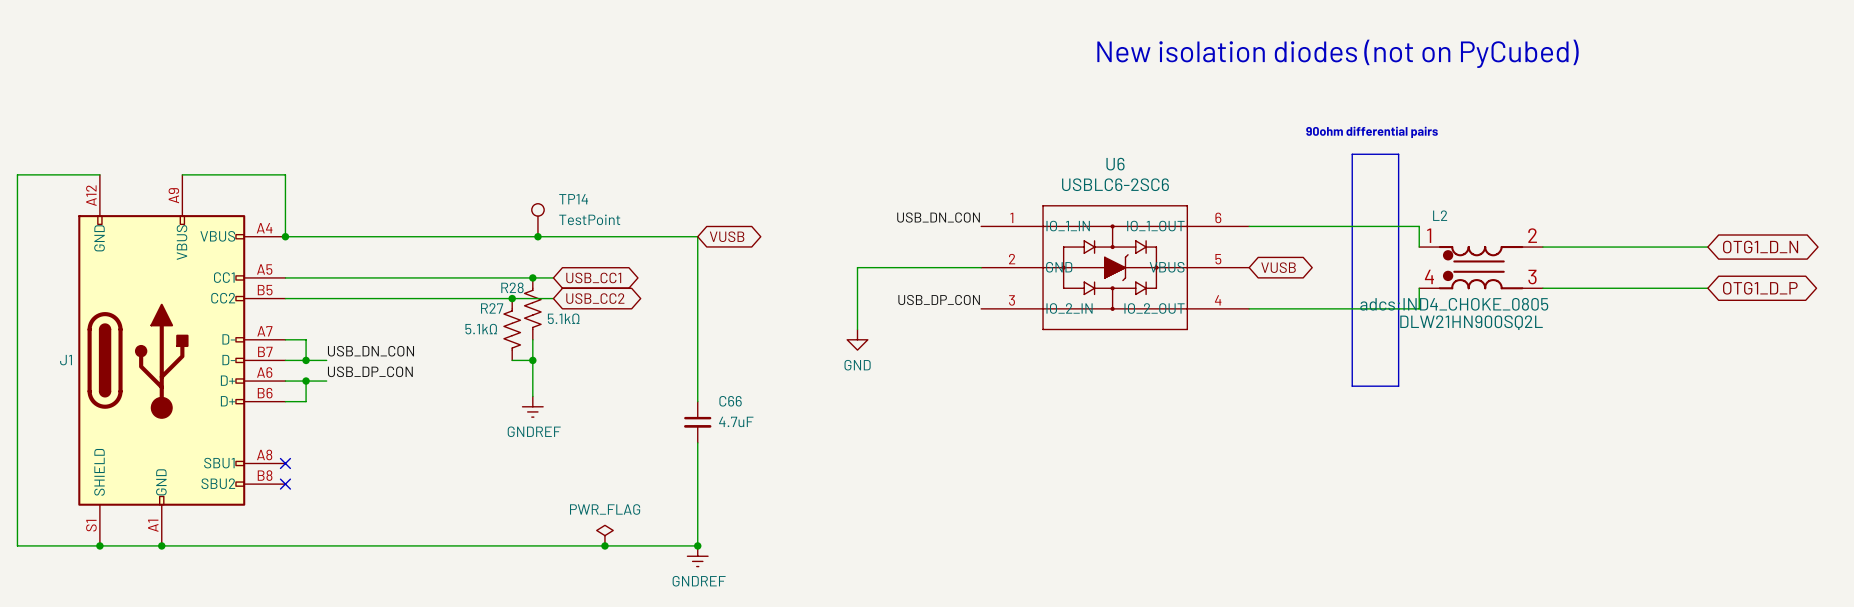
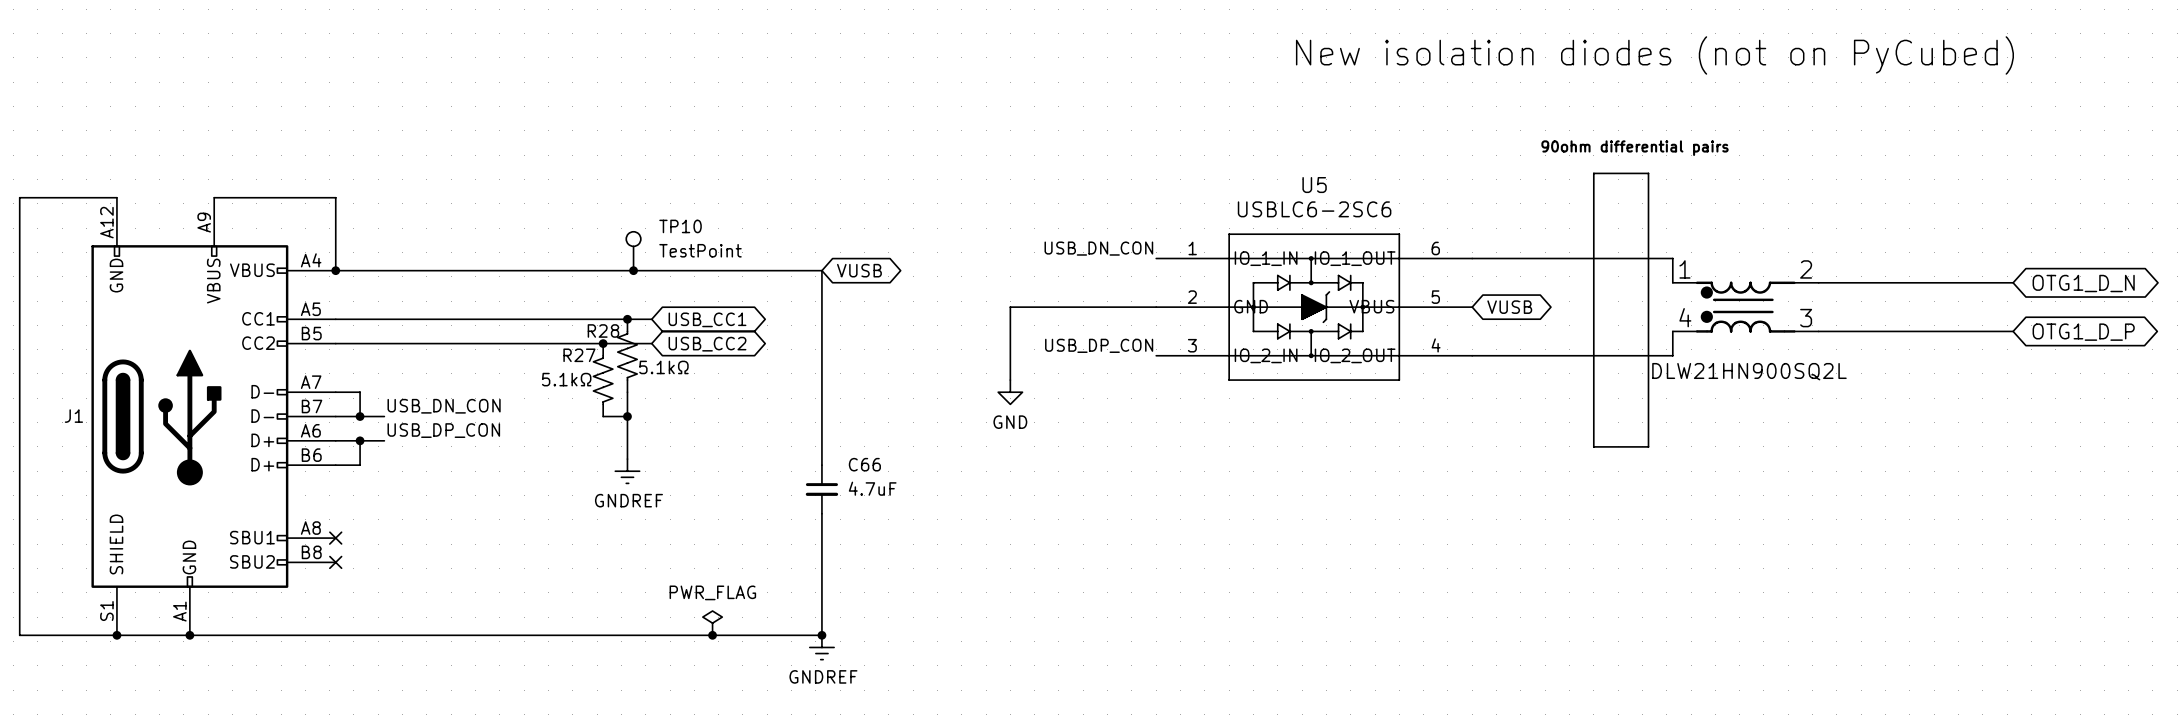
U6 name: U6 (1115, 164) -> U5 (1314, 185)
TP14 name: TP14 (573, 199) -> TP10 (680, 226)
L2 name: L2 (1440, 215) -> none
L2 text: adcs:IND4_CHOKE_0805 (1454, 304) -> none

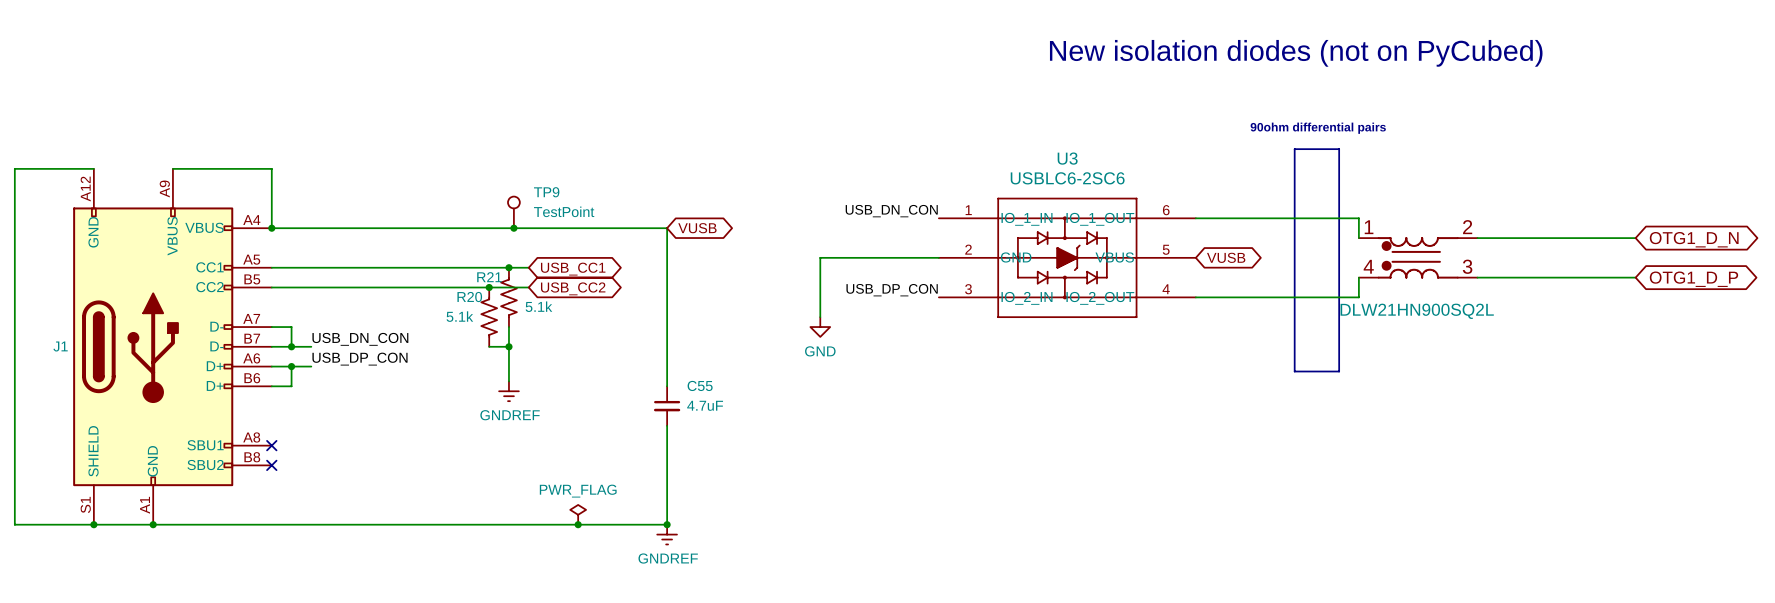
U5 name: U5 (1314, 185) -> U3 (1067, 158)
TP10 name: TP10 (680, 226) -> TP9 (546, 192)
R28 name: R28 (603, 330) -> R21 (489, 277)
R27 name: R27 (579, 355) -> R20 (469, 297)
R28 value: 5.1kΩ (663, 367) -> 5.1k (538, 306)
R27 value: 5.1kΩ (566, 379) -> 5.1k (459, 316)
C66 name: C66 (864, 464) -> C55 (700, 385)

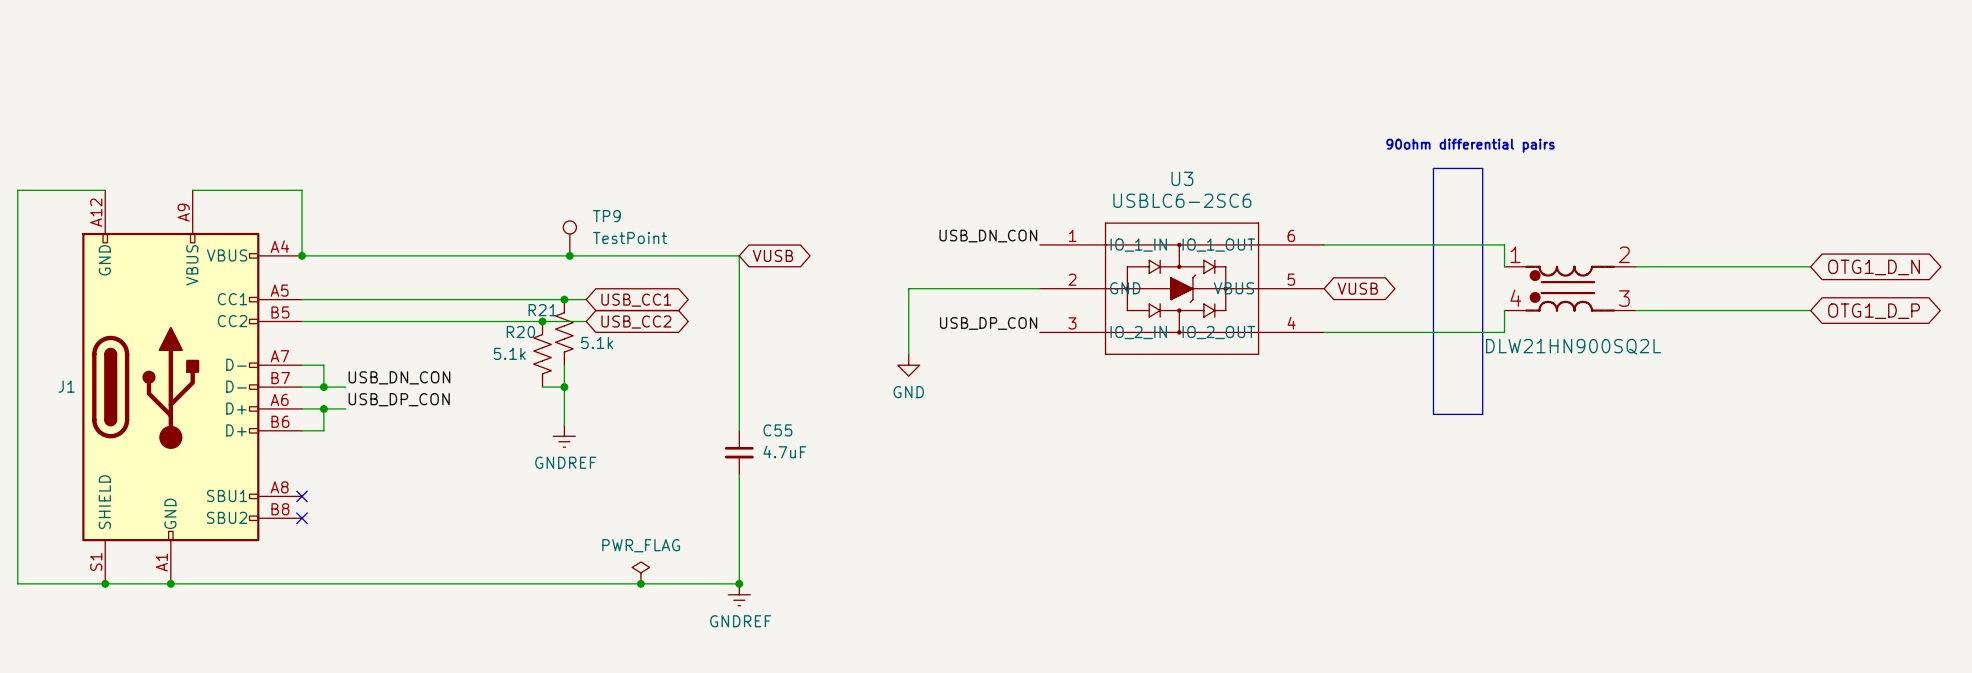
text: New isolation diodes (not on PyCubed) (1296, 53) -> none

